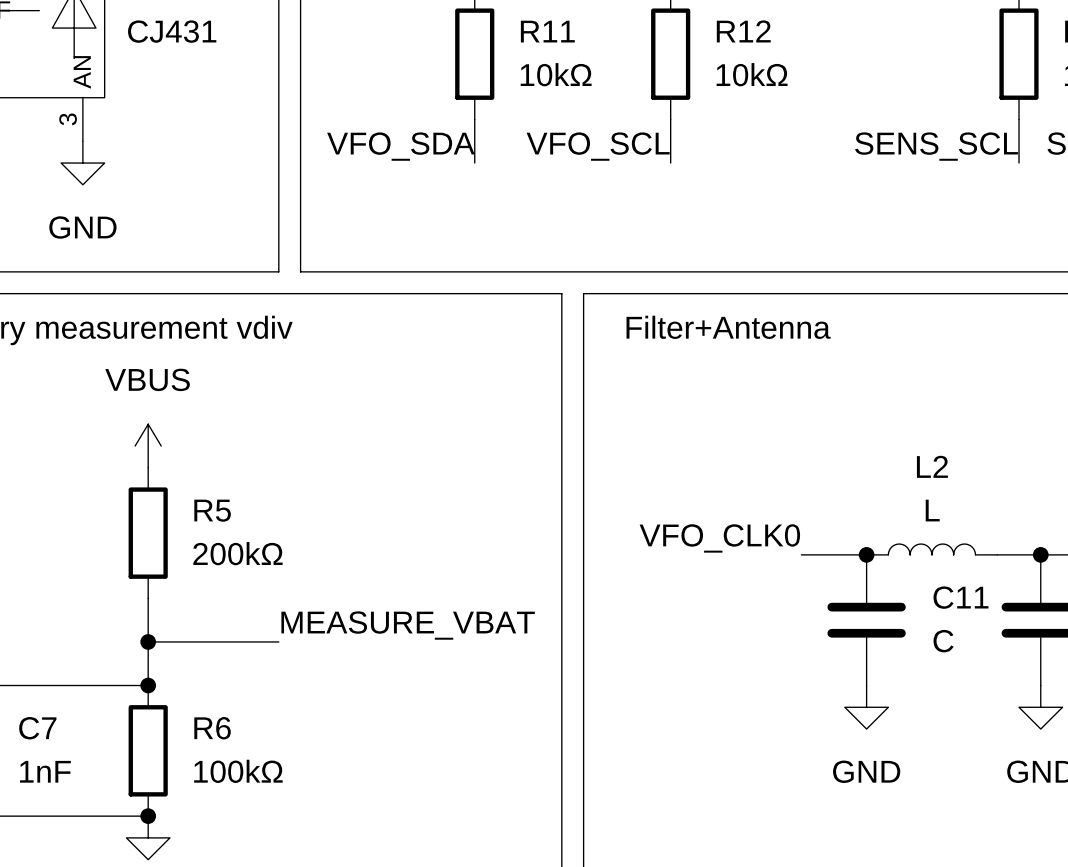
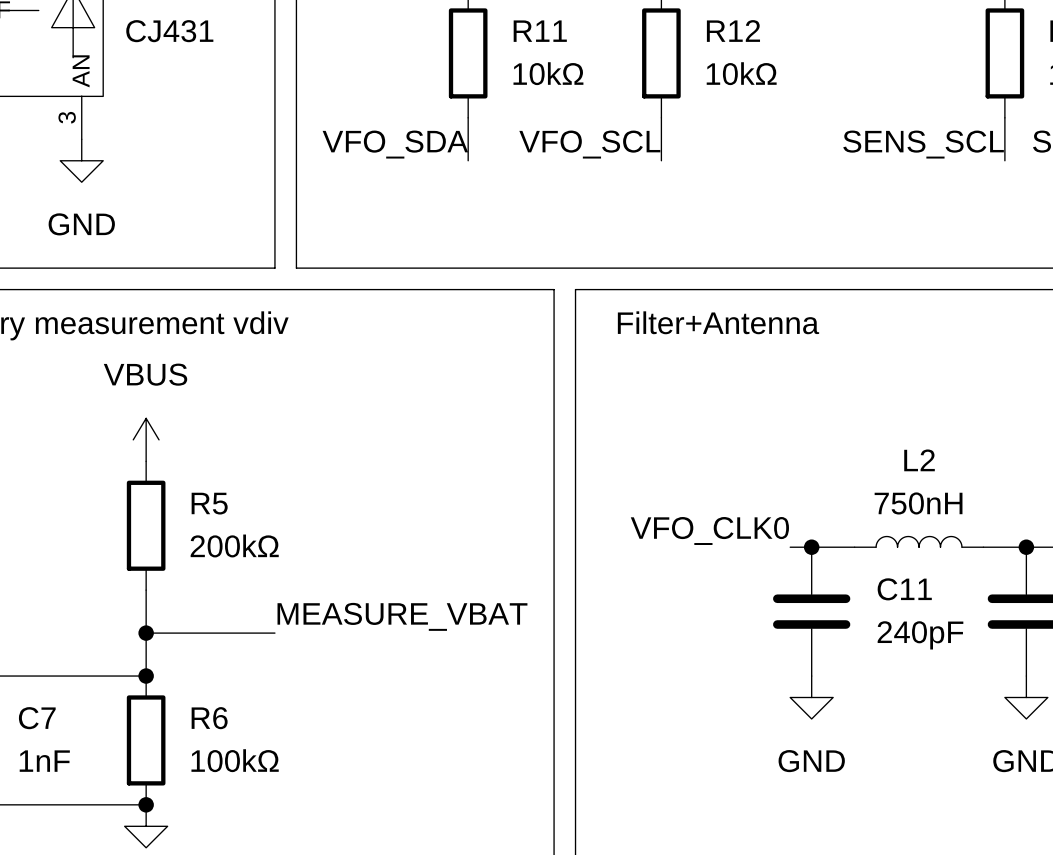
L2 value: L (932, 510) -> 750nH (918, 503)
junction position: (866, 554) -> (811, 547)
C11 position: (866, 620) -> (811, 611)
C11 value: C (943, 641) -> 240pF (920, 635)
power symbol position: GND (866, 707) -> GND (811, 697)

